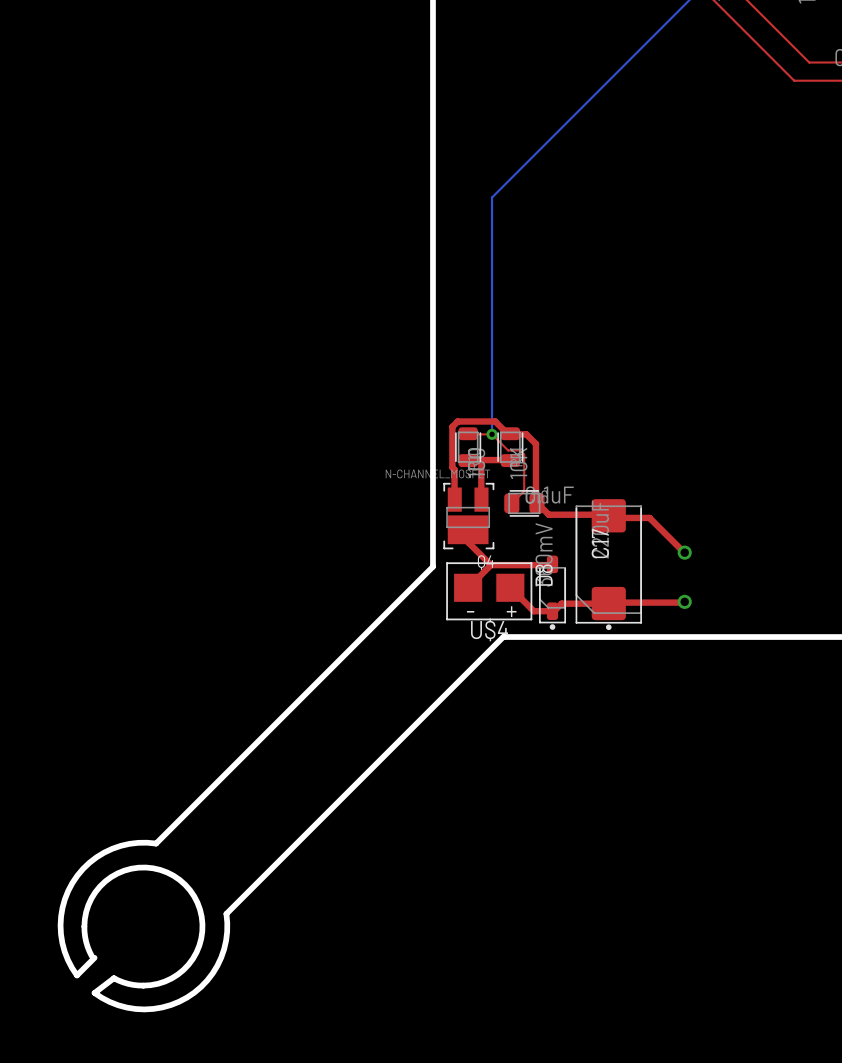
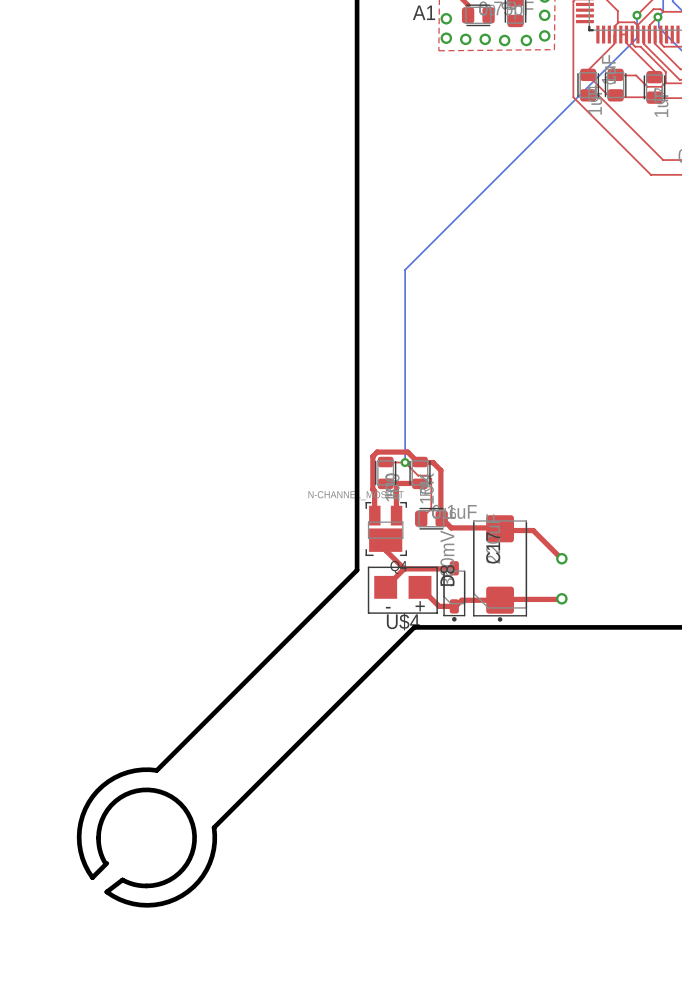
board edge: (186, 812) (156, 843) (138, 842) (112, 848) (89, 862) (72, 883) (64, 899) (61, 916) (61, 934) (64, 951) (77, 975) (94, 957) -> (156, 770) (142, 769) (121, 774) (102, 785) (88, 802) (82, 815) (79, 829) (79, 844) (82, 858) (92, 877) (106, 863)
board edge: (257, 883) (226, 913) (227, 931) (224, 949) (212, 973) (194, 992) (179, 1001) (153, 1008) (135, 1008) (118, 1005) (94, 993) (113, 978) (138, 985) (164, 981) (177, 974) (192, 958) (199, 945) (202, 931) (200, 909) (190, 890) (173, 875) (160, 869) (138, 867) (117, 873) (99, 886) (91, 898) (84, 919) (85, 936) (91, 956) -> (214, 827) (214, 842) (209, 863) (198, 881) (188, 891) (168, 901) (154, 904) (133, 903) (119, 899) (106, 891) (122, 879) (134, 884) (146, 885) (158, 884) (174, 877) (186, 864) (194, 841) (190, 818) (176, 799) (154, 790) (130, 792) (115, 801) (101, 820) (98, 842) (104, 861)

